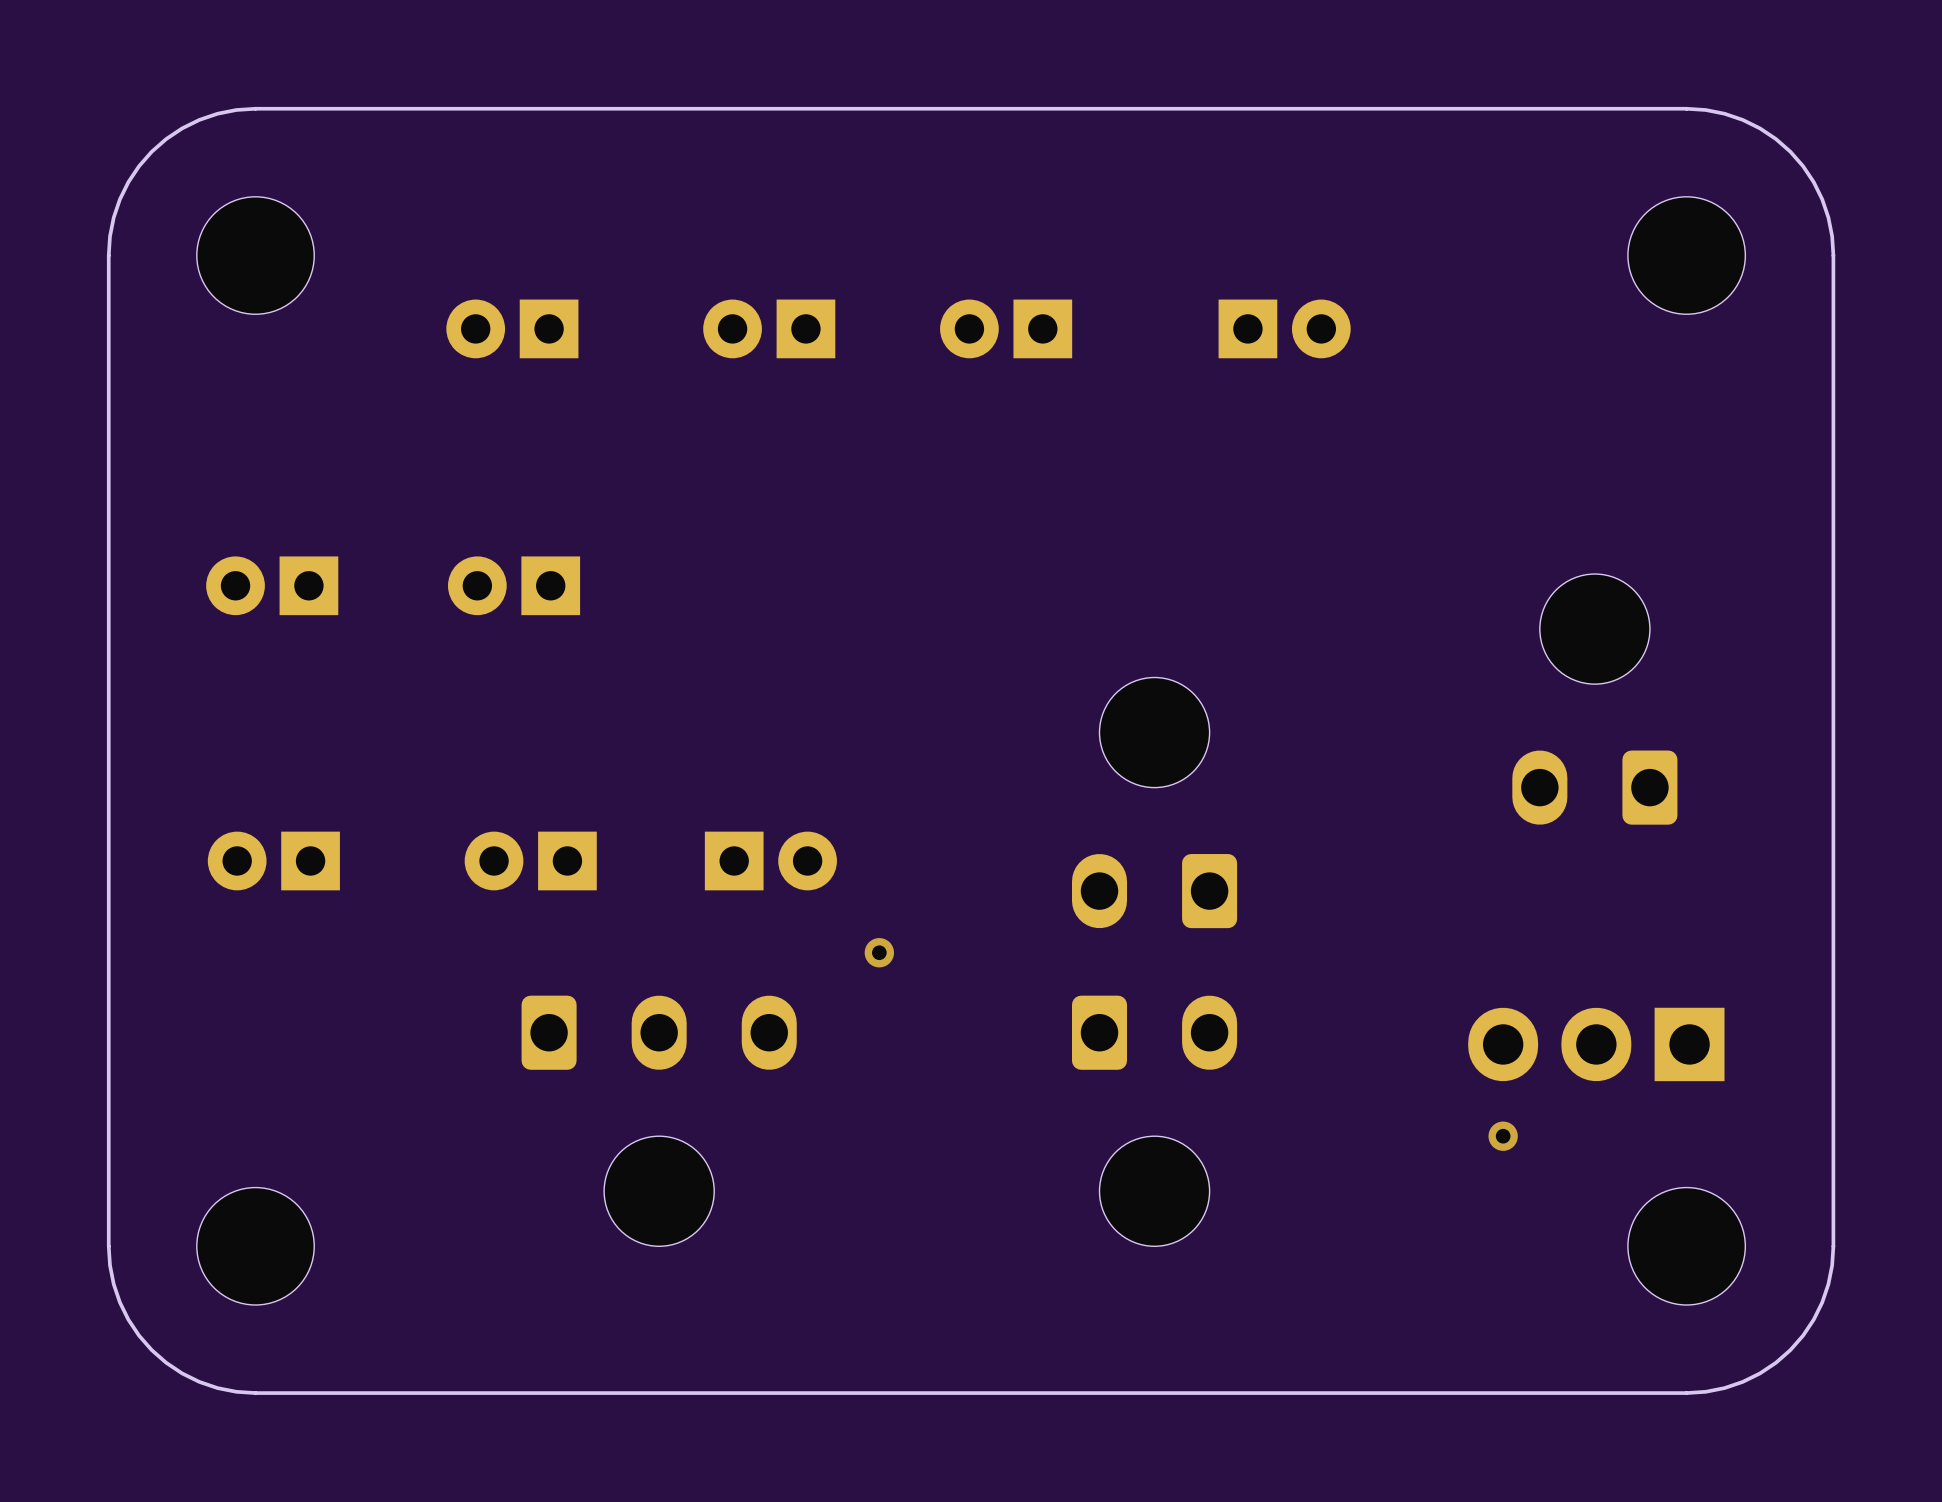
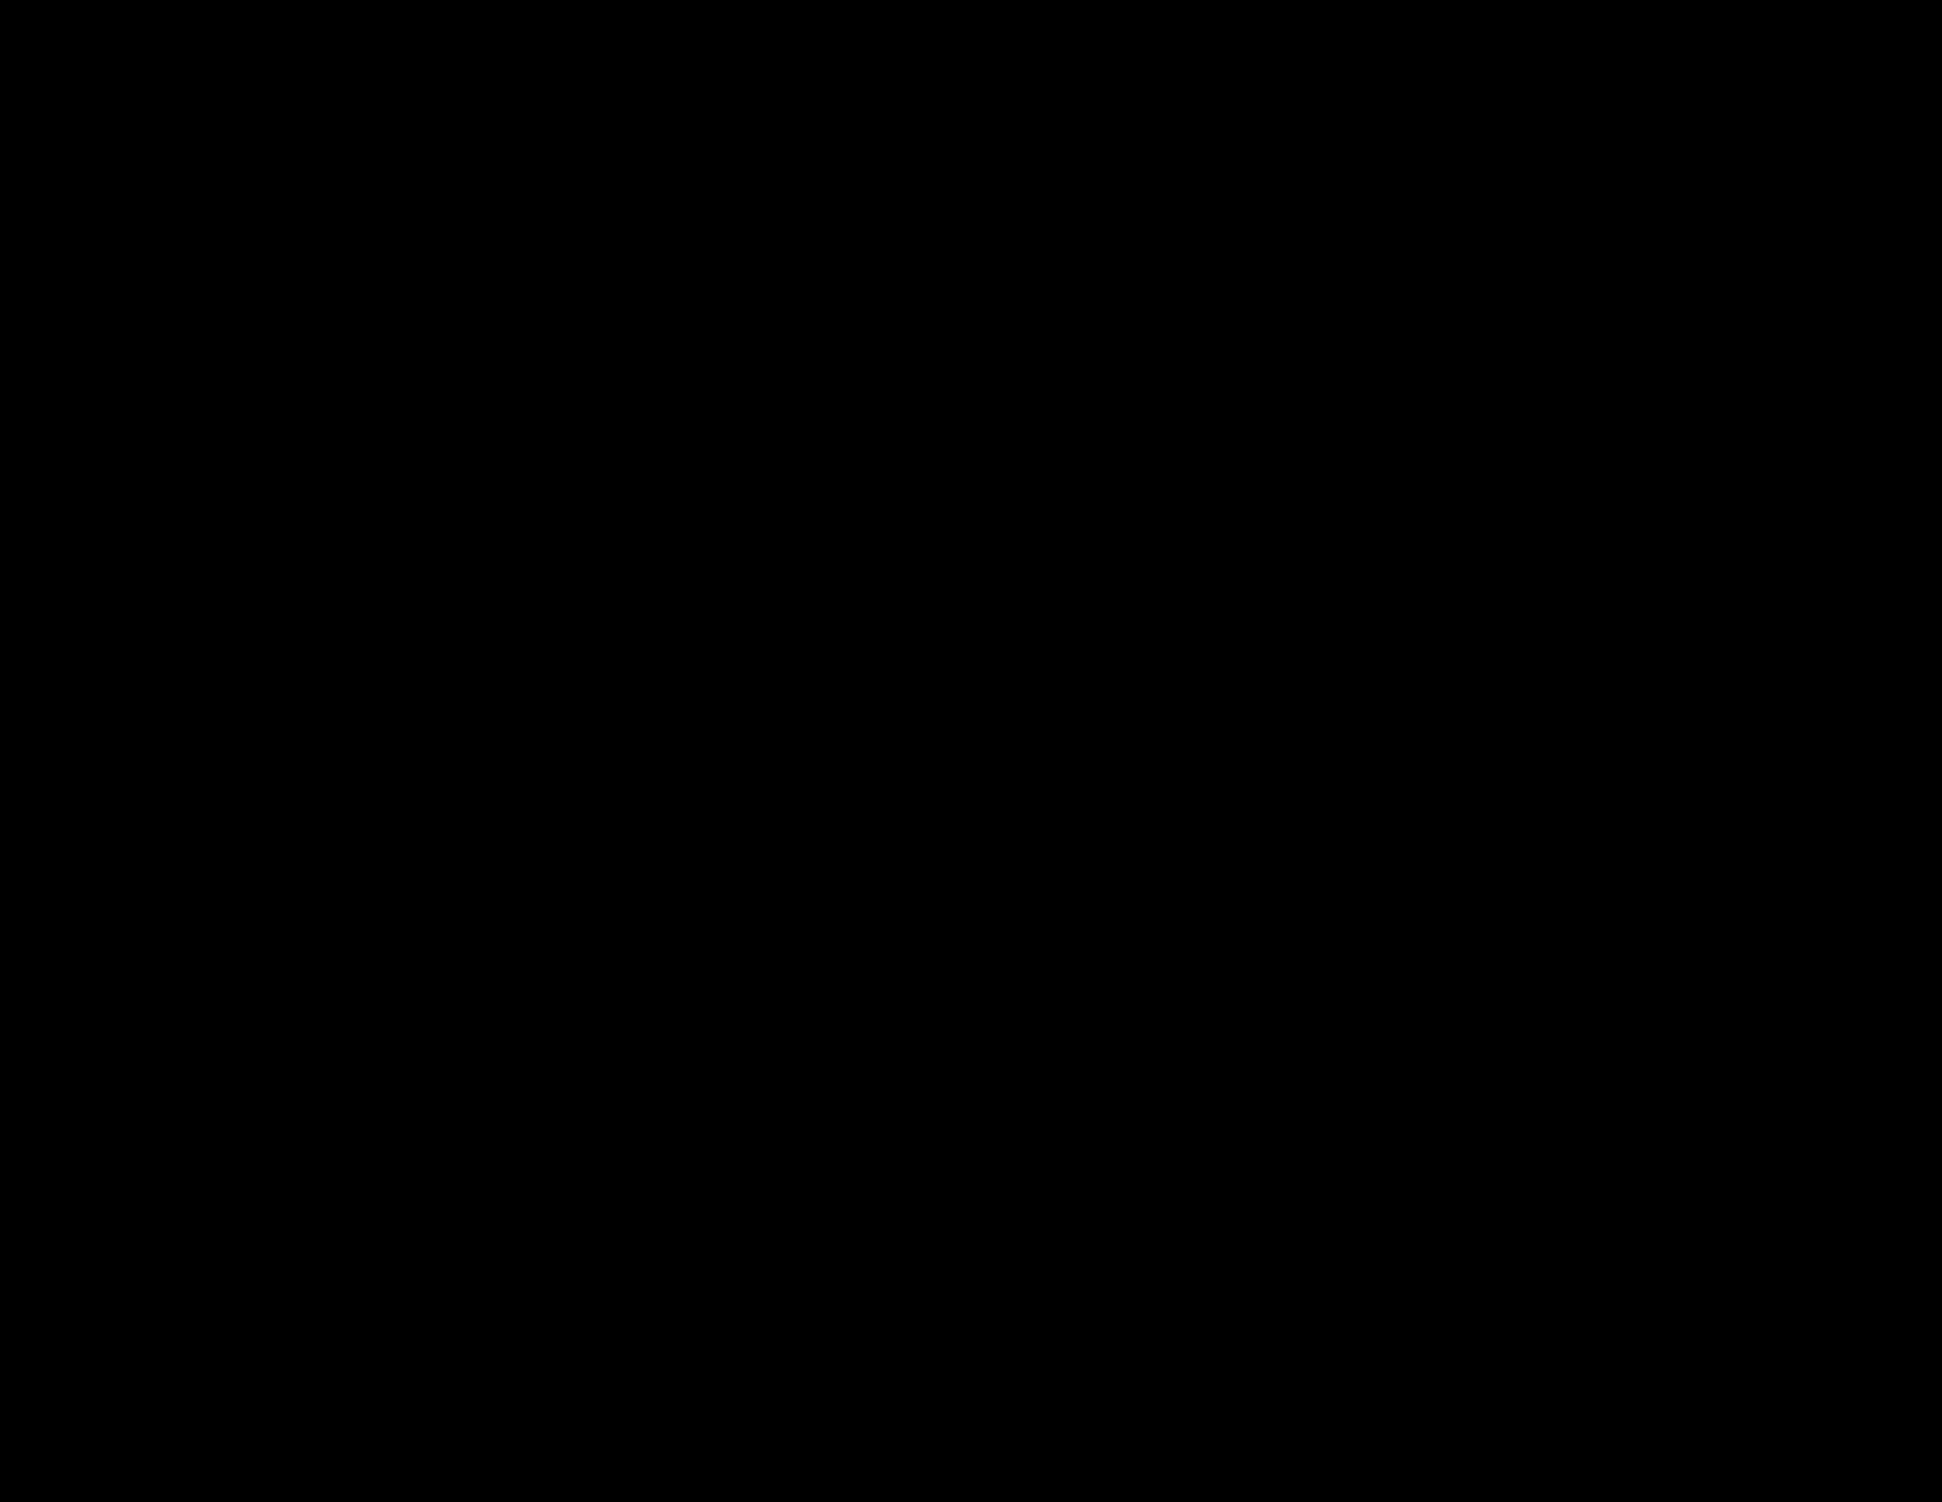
board edge: (1686, 108) (255, 108) (217, 113) (199, 119) (166, 139) (139, 166) (119, 199) (110, 236) (108, 255) (108, 1246) (113, 1284) (128, 1319) (139, 1335) (166, 1362) (199, 1381) (236, 1391) (255, 1393) (1686, 1393) (1705, 1391) (1742, 1381) (1775, 1362) (1803, 1335) (1822, 1302) (1832, 1265) (1833, 1246) (1832, 236) (1822, 199) (1803, 166) (1790, 151) (1760, 128) (1742, 119) (1724, 113) (1686, 108) -> none
part: (255, 255) -> none
part: (1686, 255) -> none
part: (512, 328) -> none
part: (769, 328) -> none
part: (1006, 328) -> none
part: (1284, 328) -> none
part: (272, 585) -> none
part: (514, 585) -> none
part: (1594, 699) -> none
part: (1154, 802) -> none
part: (273, 860) -> none
part: (530, 860) -> none
part: (770, 860) -> none
via: (879, 952) -> none
part: (1596, 1044) -> none
part: (659, 1120) -> none
part: (1154, 1120) -> none
via: (1503, 1136) -> none
part: (255, 1246) -> none
part: (1686, 1246) -> none

